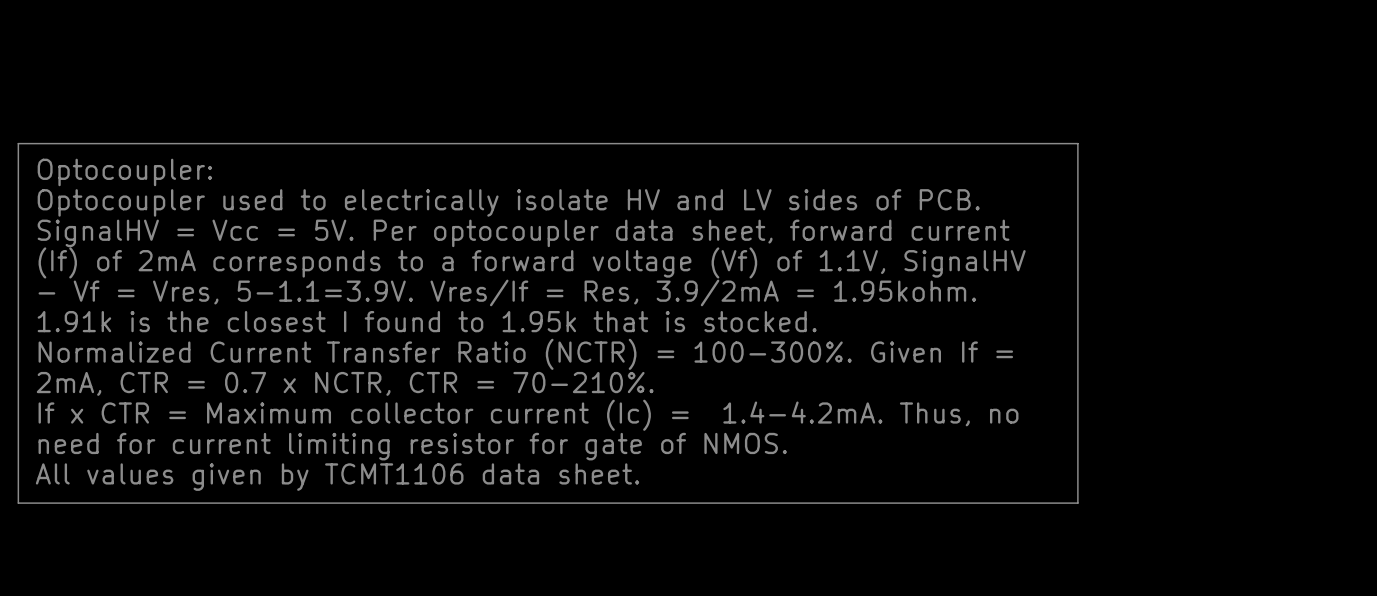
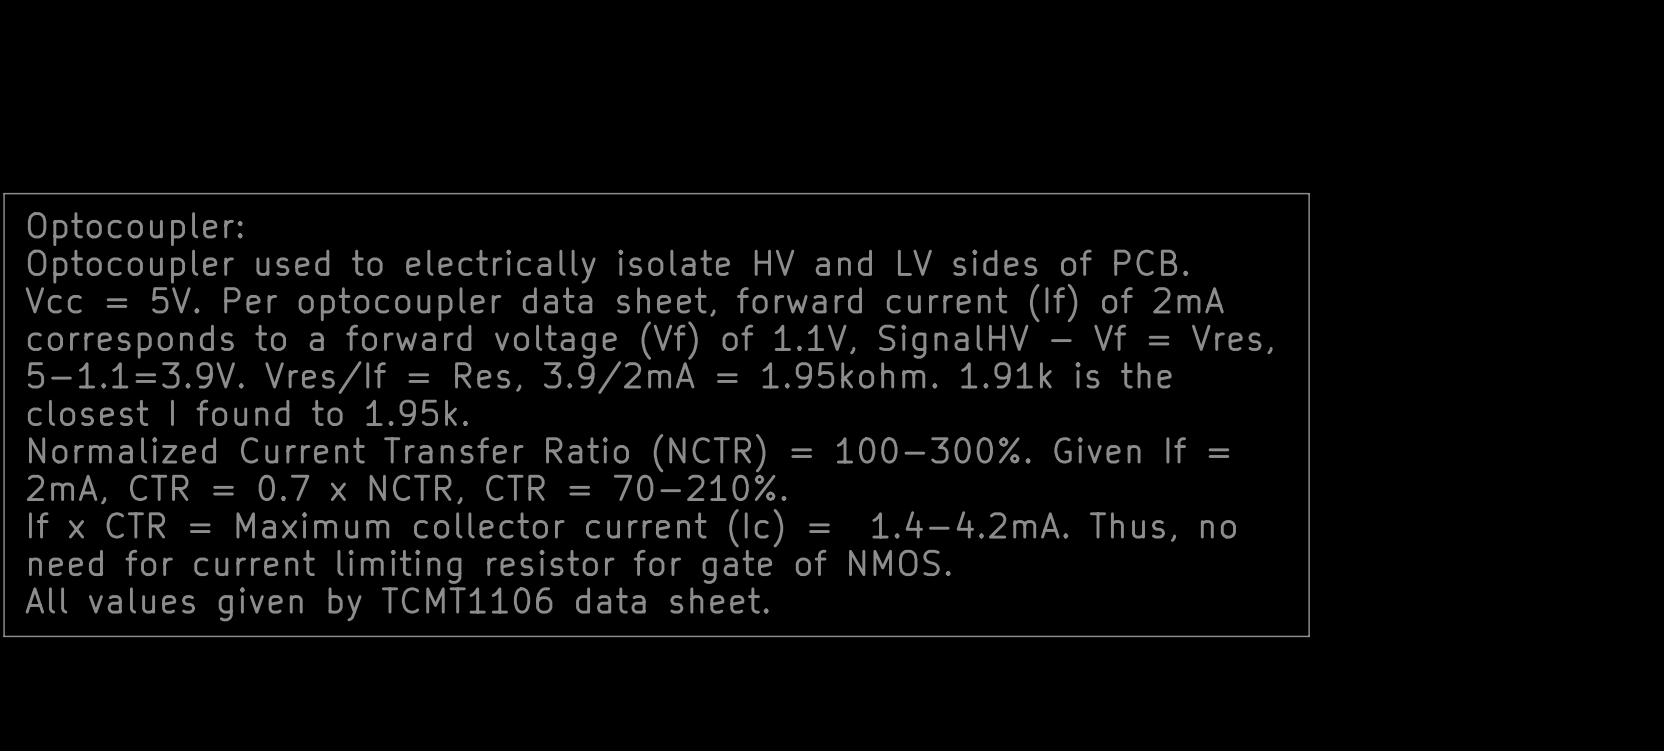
text: SignalHV = Vcc = 5V. Per optocoupler data sheet, forward current (523, 233) -> Vcc = 5V. Per optocoupler data sheet, forward current (If) of 2mA (624, 303)
text: (If) of 2mA corresponds to a forward voltage (Vf) of 1.1V, SignalHV (532, 262) -> corresponds to a forward voltage (Vf) of 1.1V, SignalHV - Vf = Vres, (650, 340)
text: - Vf = Vres, 5-1.1=3.9V. Vres/If = Res, 3.9/2mA = 1.95kohm. (507, 292) -> 5-1.1=3.9V. Vres/If = Res, 3.9/2mA = 1.95kohm. 1.91k is the (599, 377)
text: 1.91k is the closest I found to 1.95k that is stocked. (427, 321) -> closest I found to 1.95k. (247, 412)

